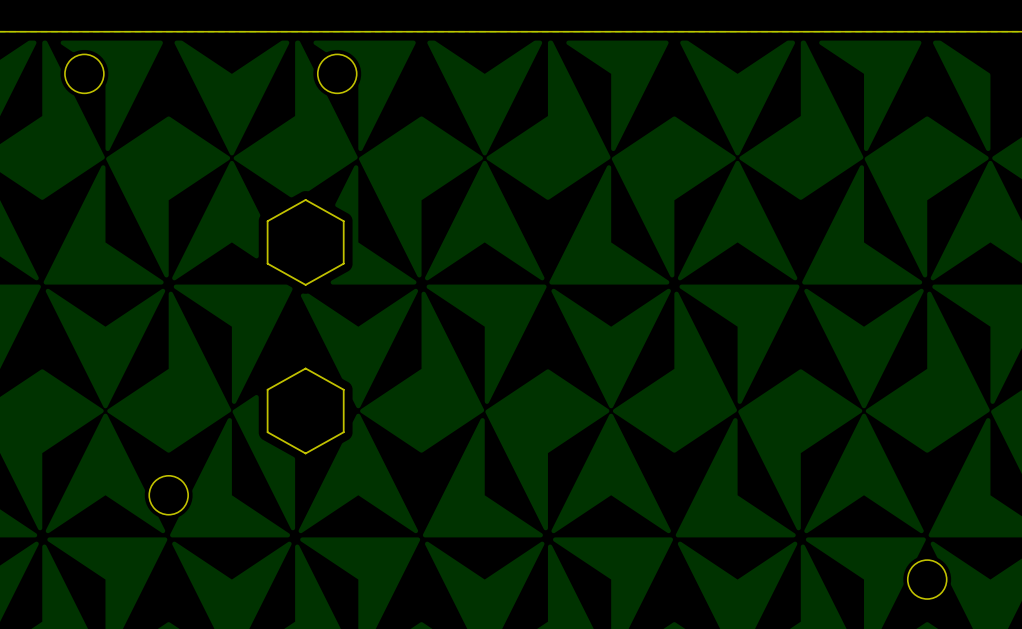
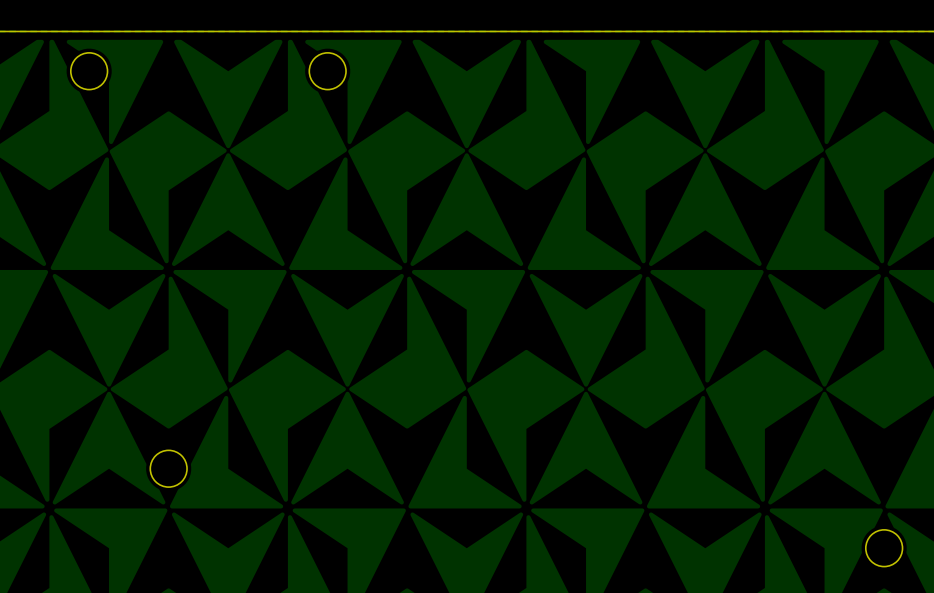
drawing: [266, 199, 345, 286] -> none
drawing: [266, 367, 345, 455] -> none

